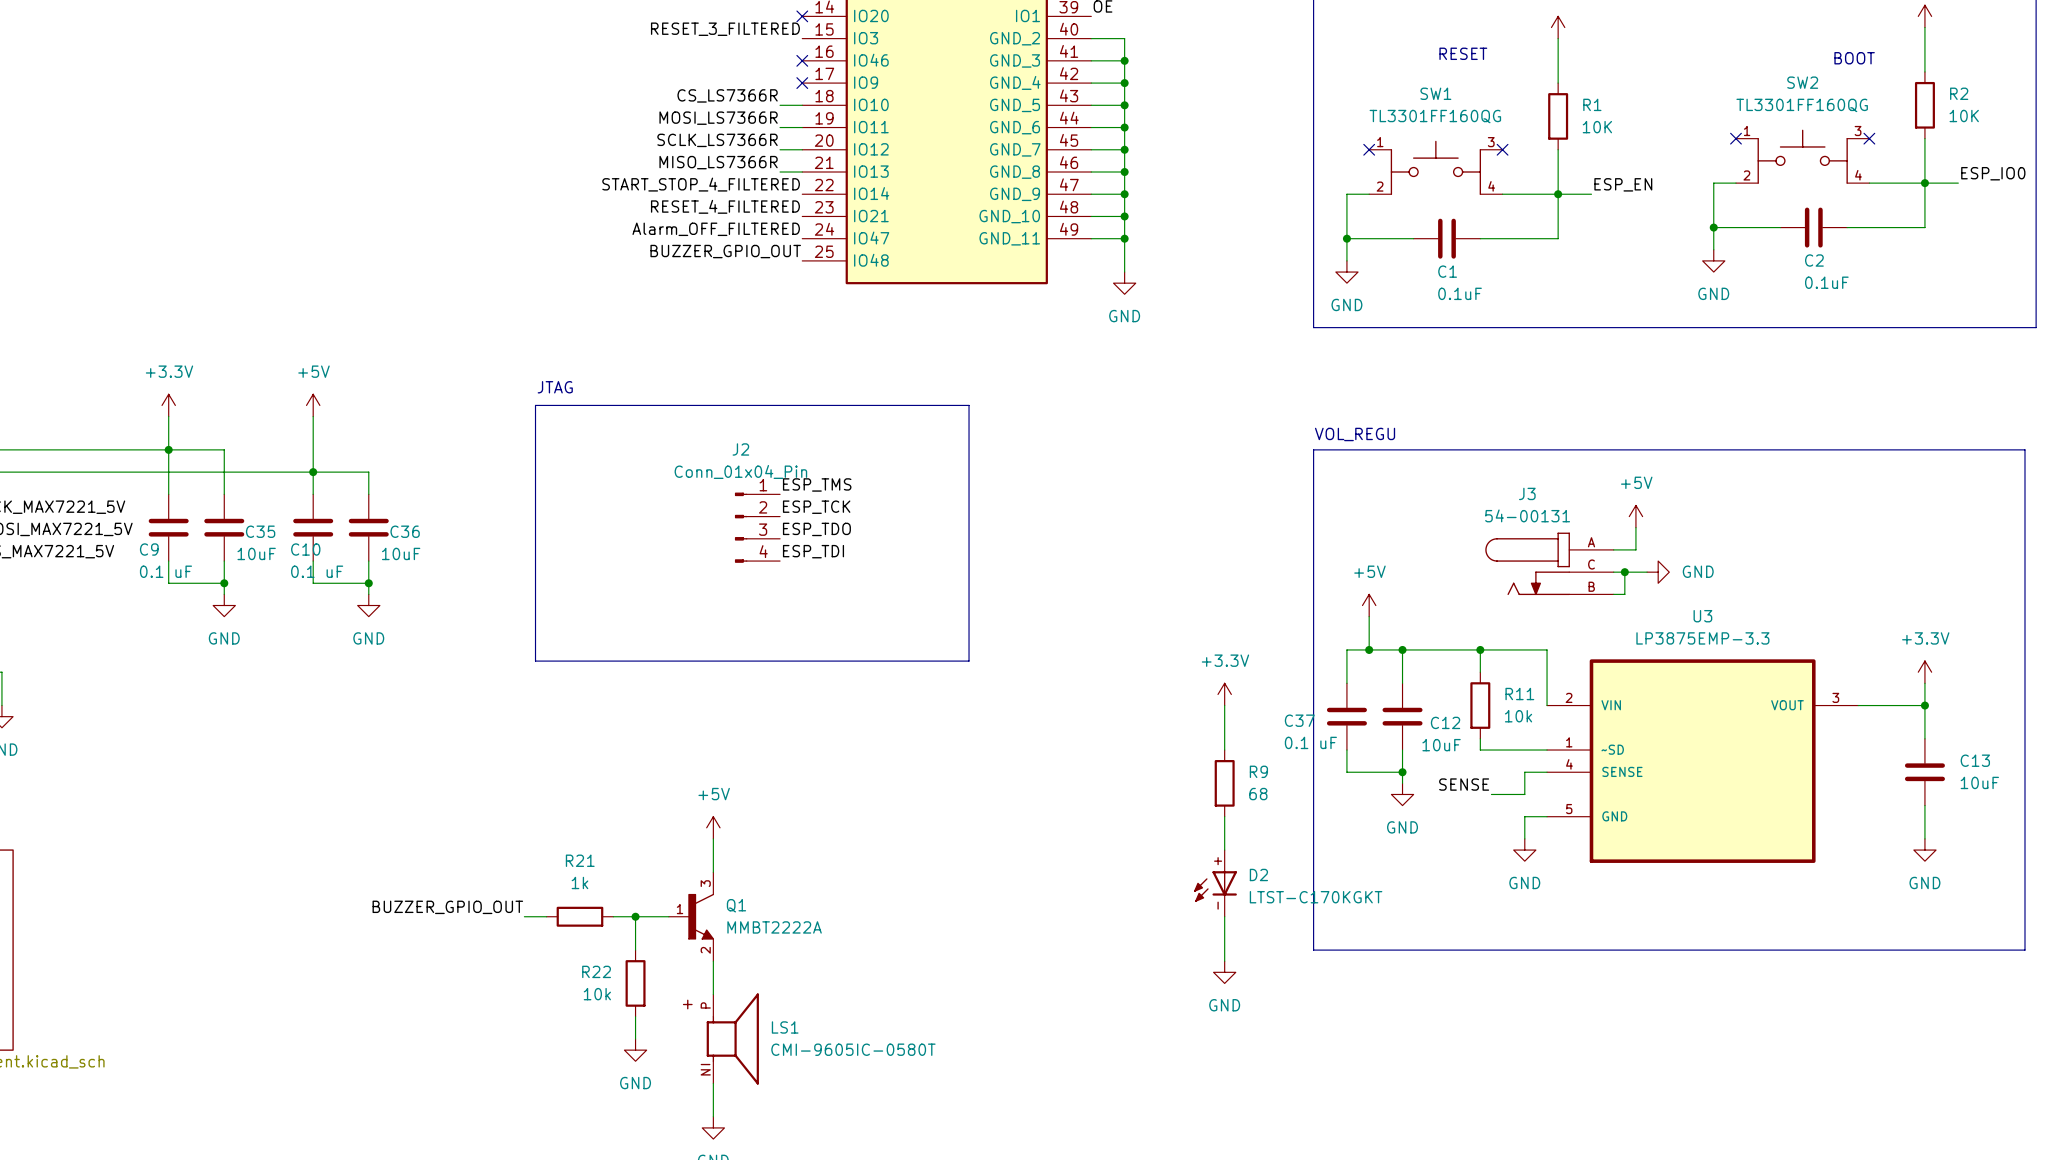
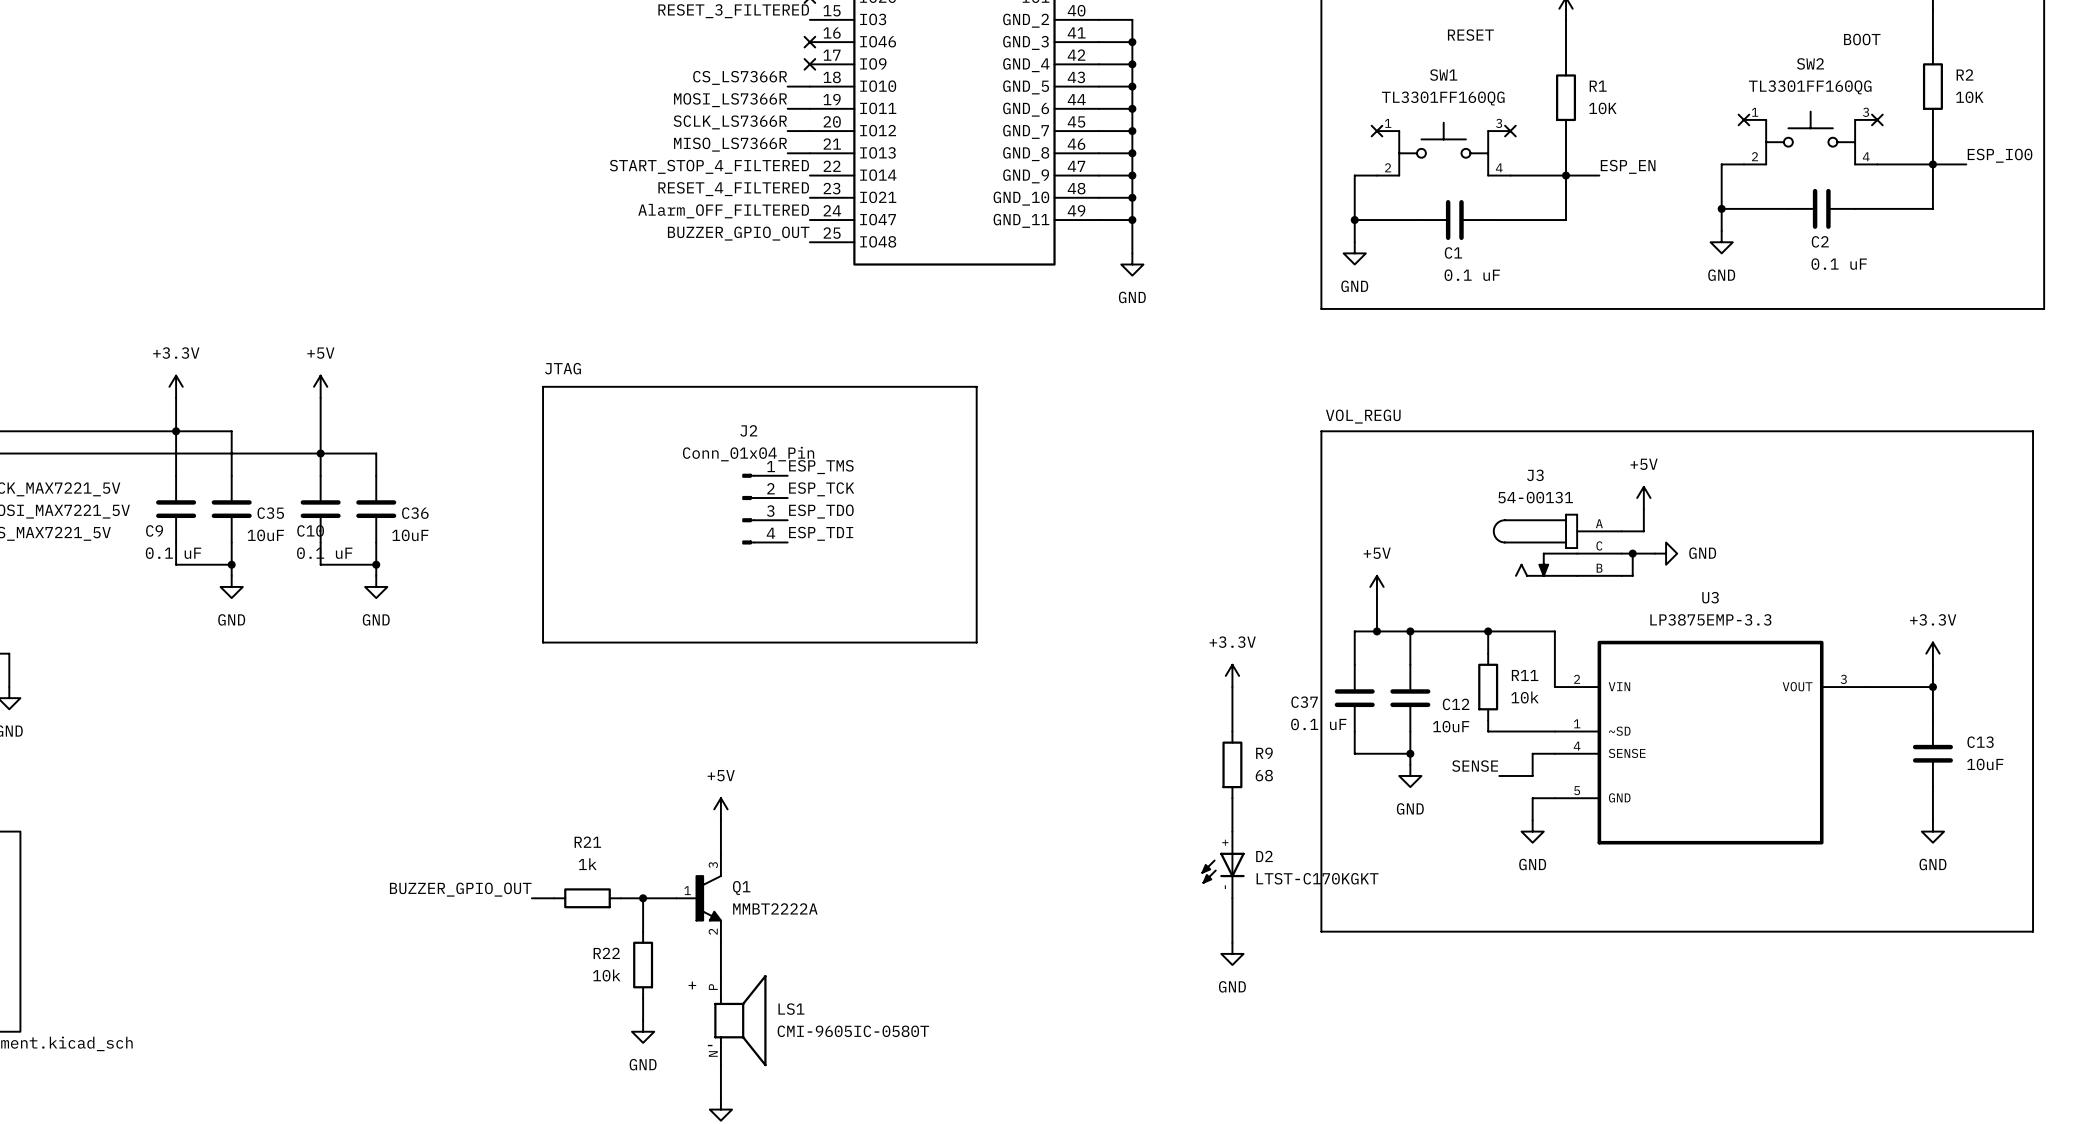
C2 value: 0.1uF (1826, 282) -> 0.1 uF (1839, 264)
C1 value: 0.1uF (1460, 293) -> 0.1 uF (1472, 275)

